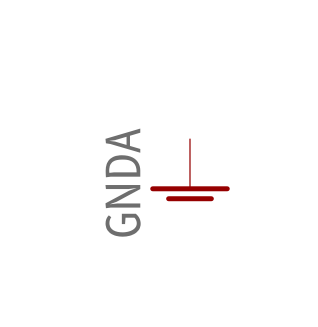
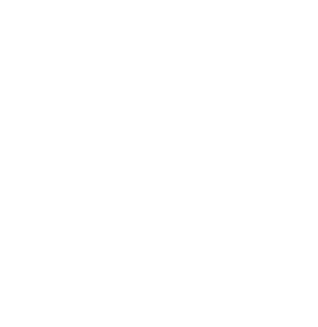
power symbol: GNDA (189, 170) -> none

